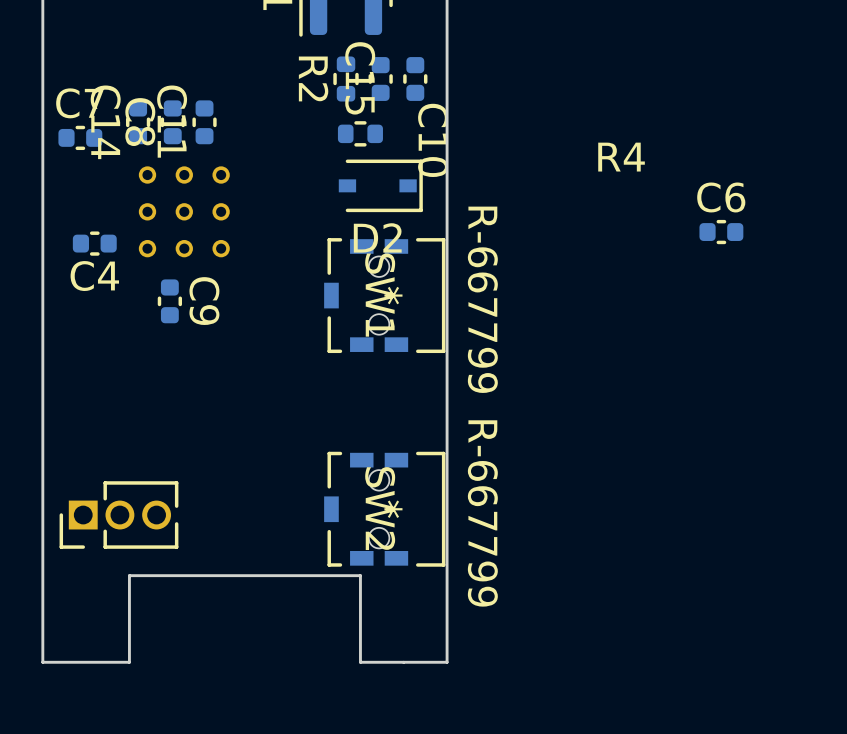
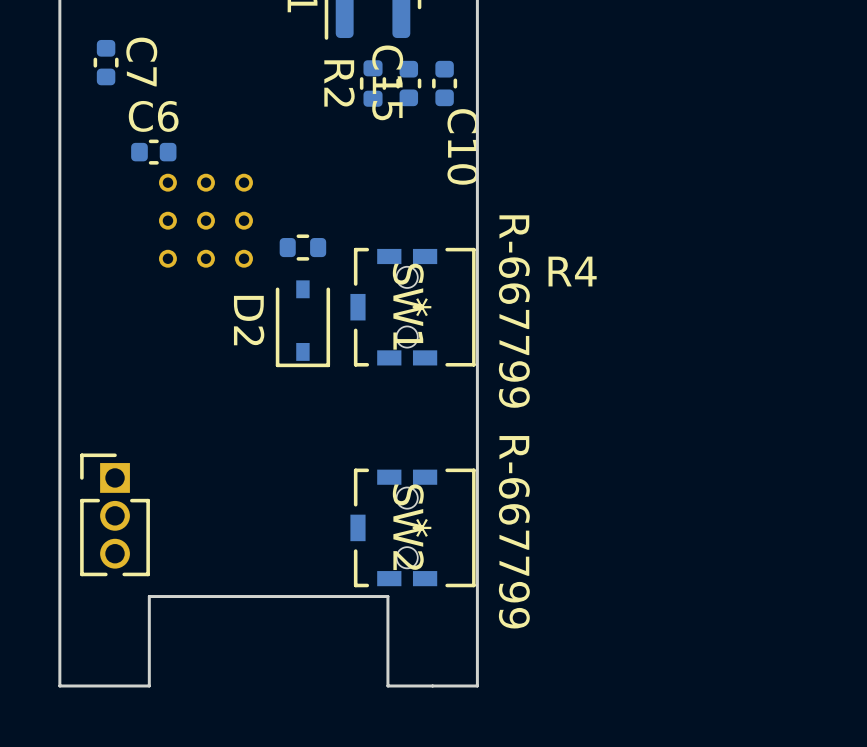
C14: (138, 122) -> none
C8: (172, 122) -> none
C11: (204, 122) -> none
R4 position: (360, 133) -> (302, 247)
C7 rotation: 0° (80, 137) -> 90° clockwise (106, 62)
C7 position: (80, 137) -> (106, 62)
D2 rotation: 0° (380, 185) -> 90° clockwise (302, 323)
D2 position: (380, 185) -> (302, 323)
C6 position: (721, 232) -> (153, 152)
C4: (94, 243) -> none
C9: (169, 301) -> none
part rotation: 0° (118, 515) -> 90° clockwise (115, 514)

